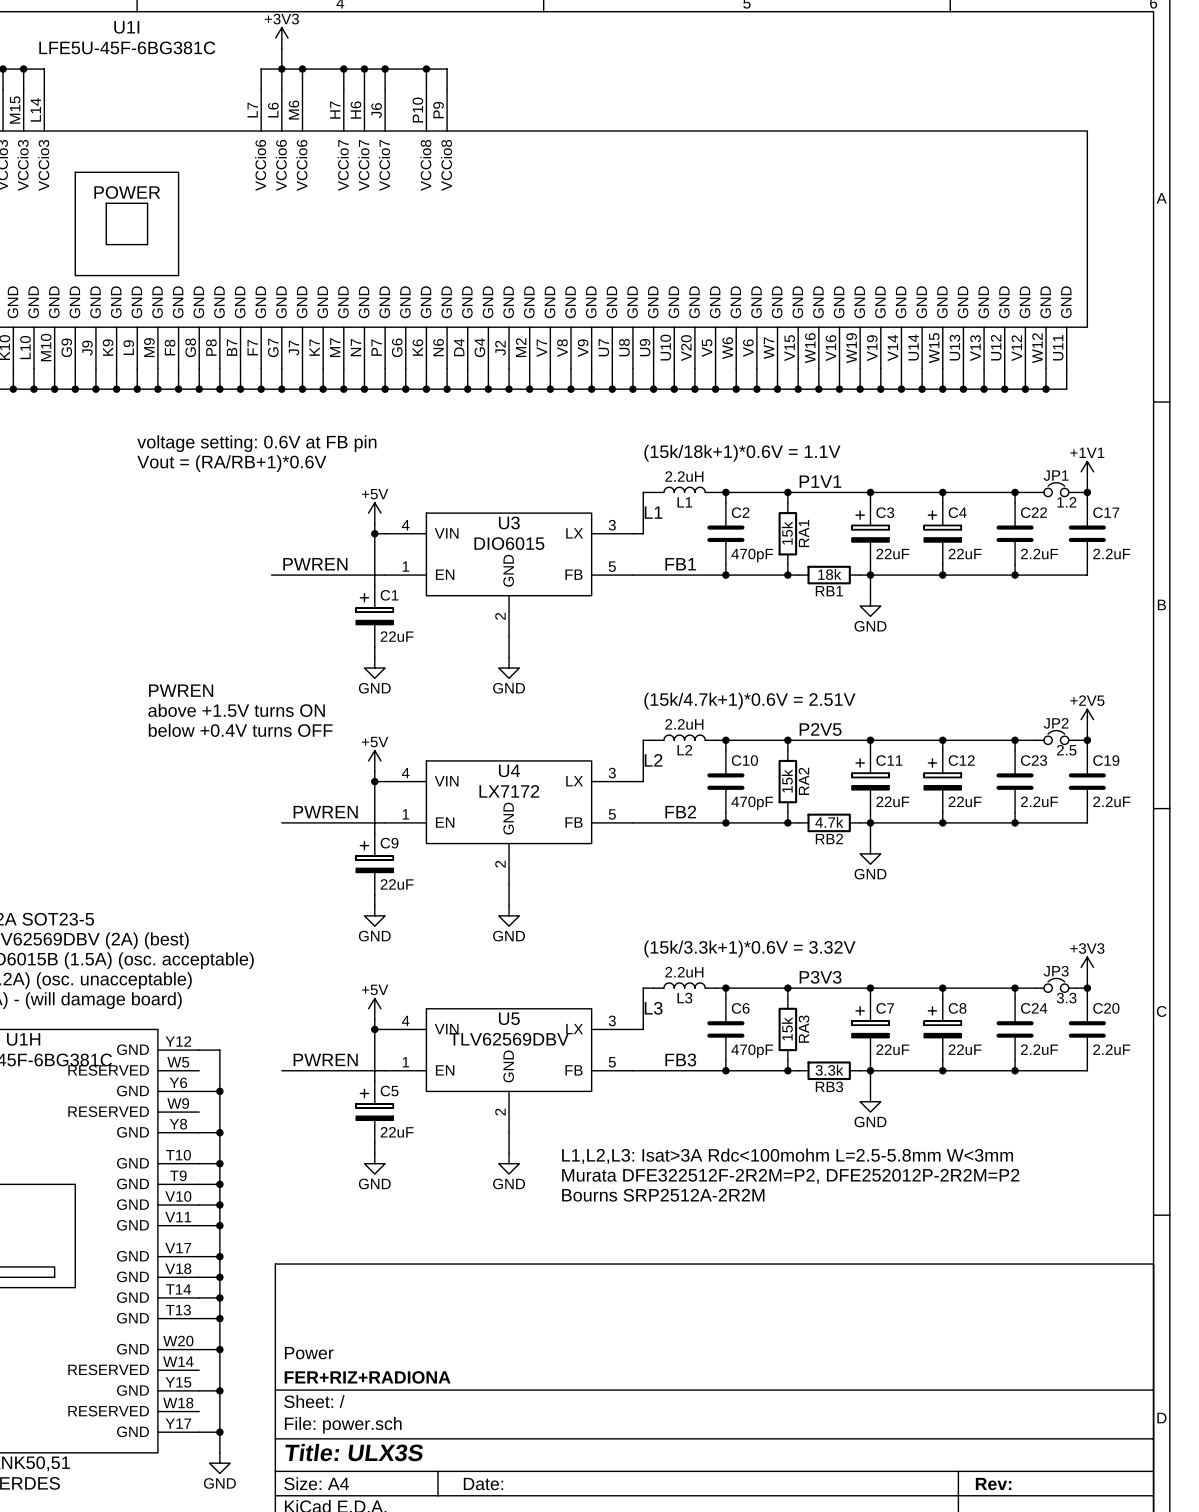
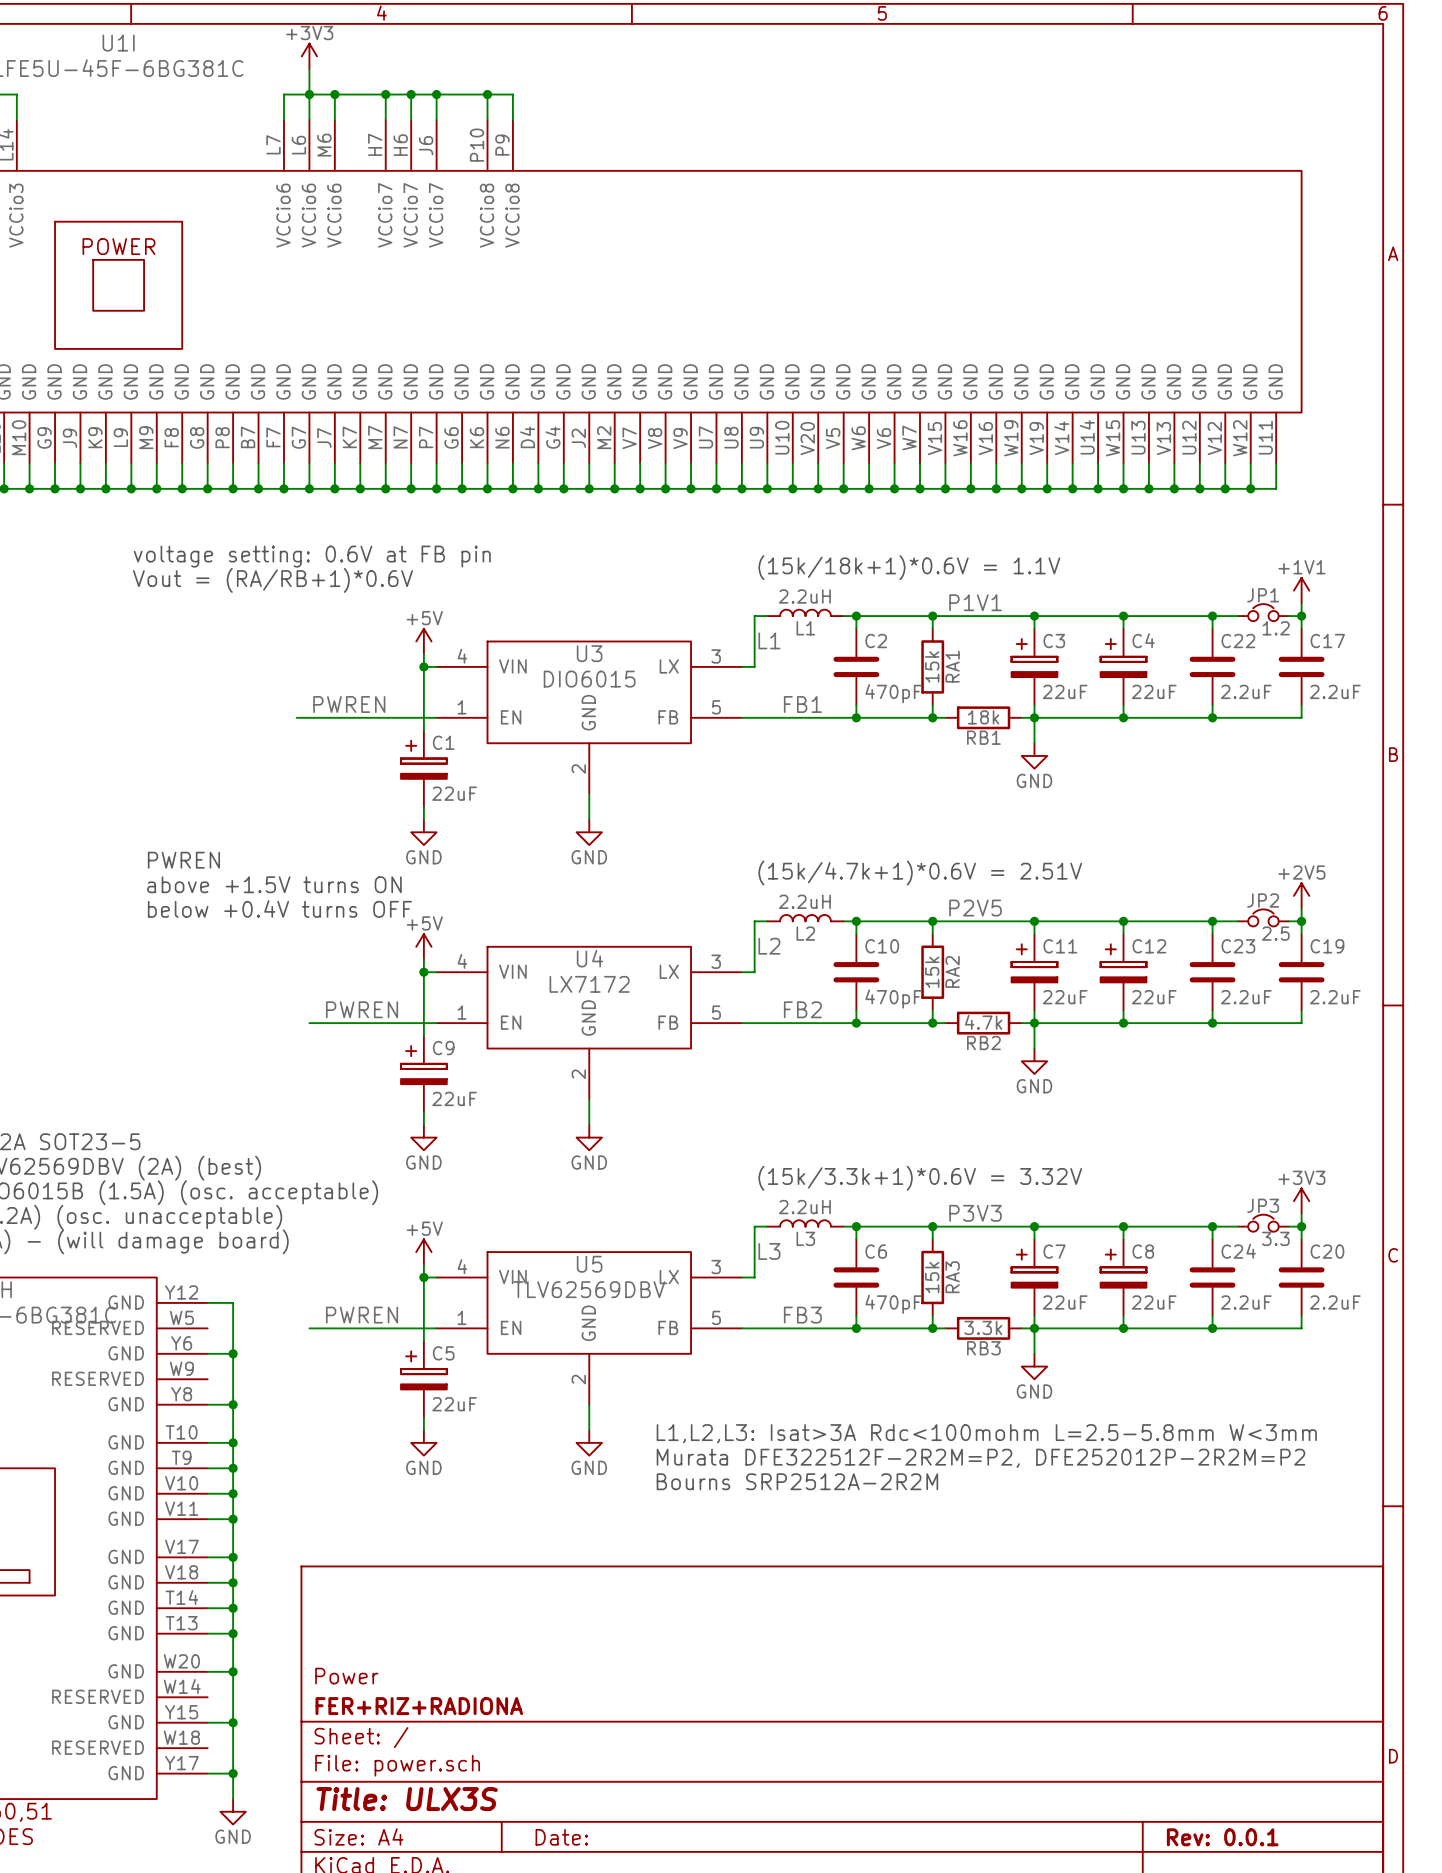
title block: Rev: (993, 1484) -> Rev: 0.0.1 (1222, 1837)

